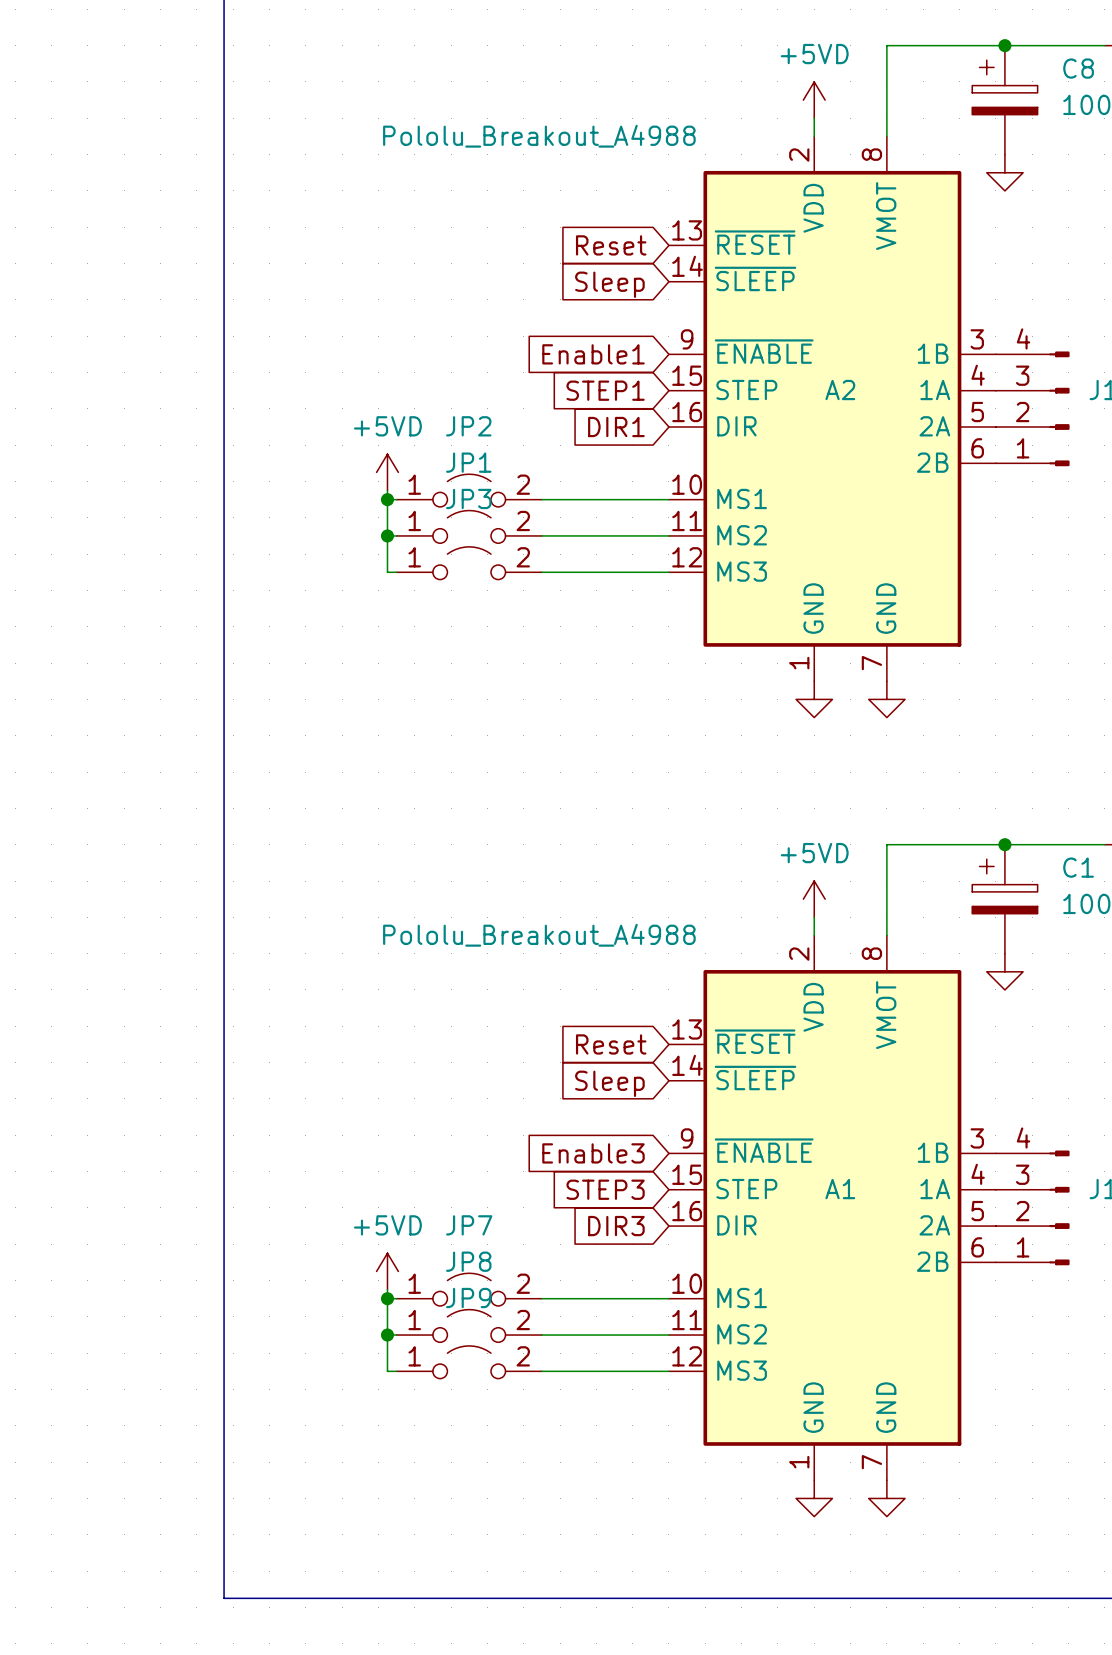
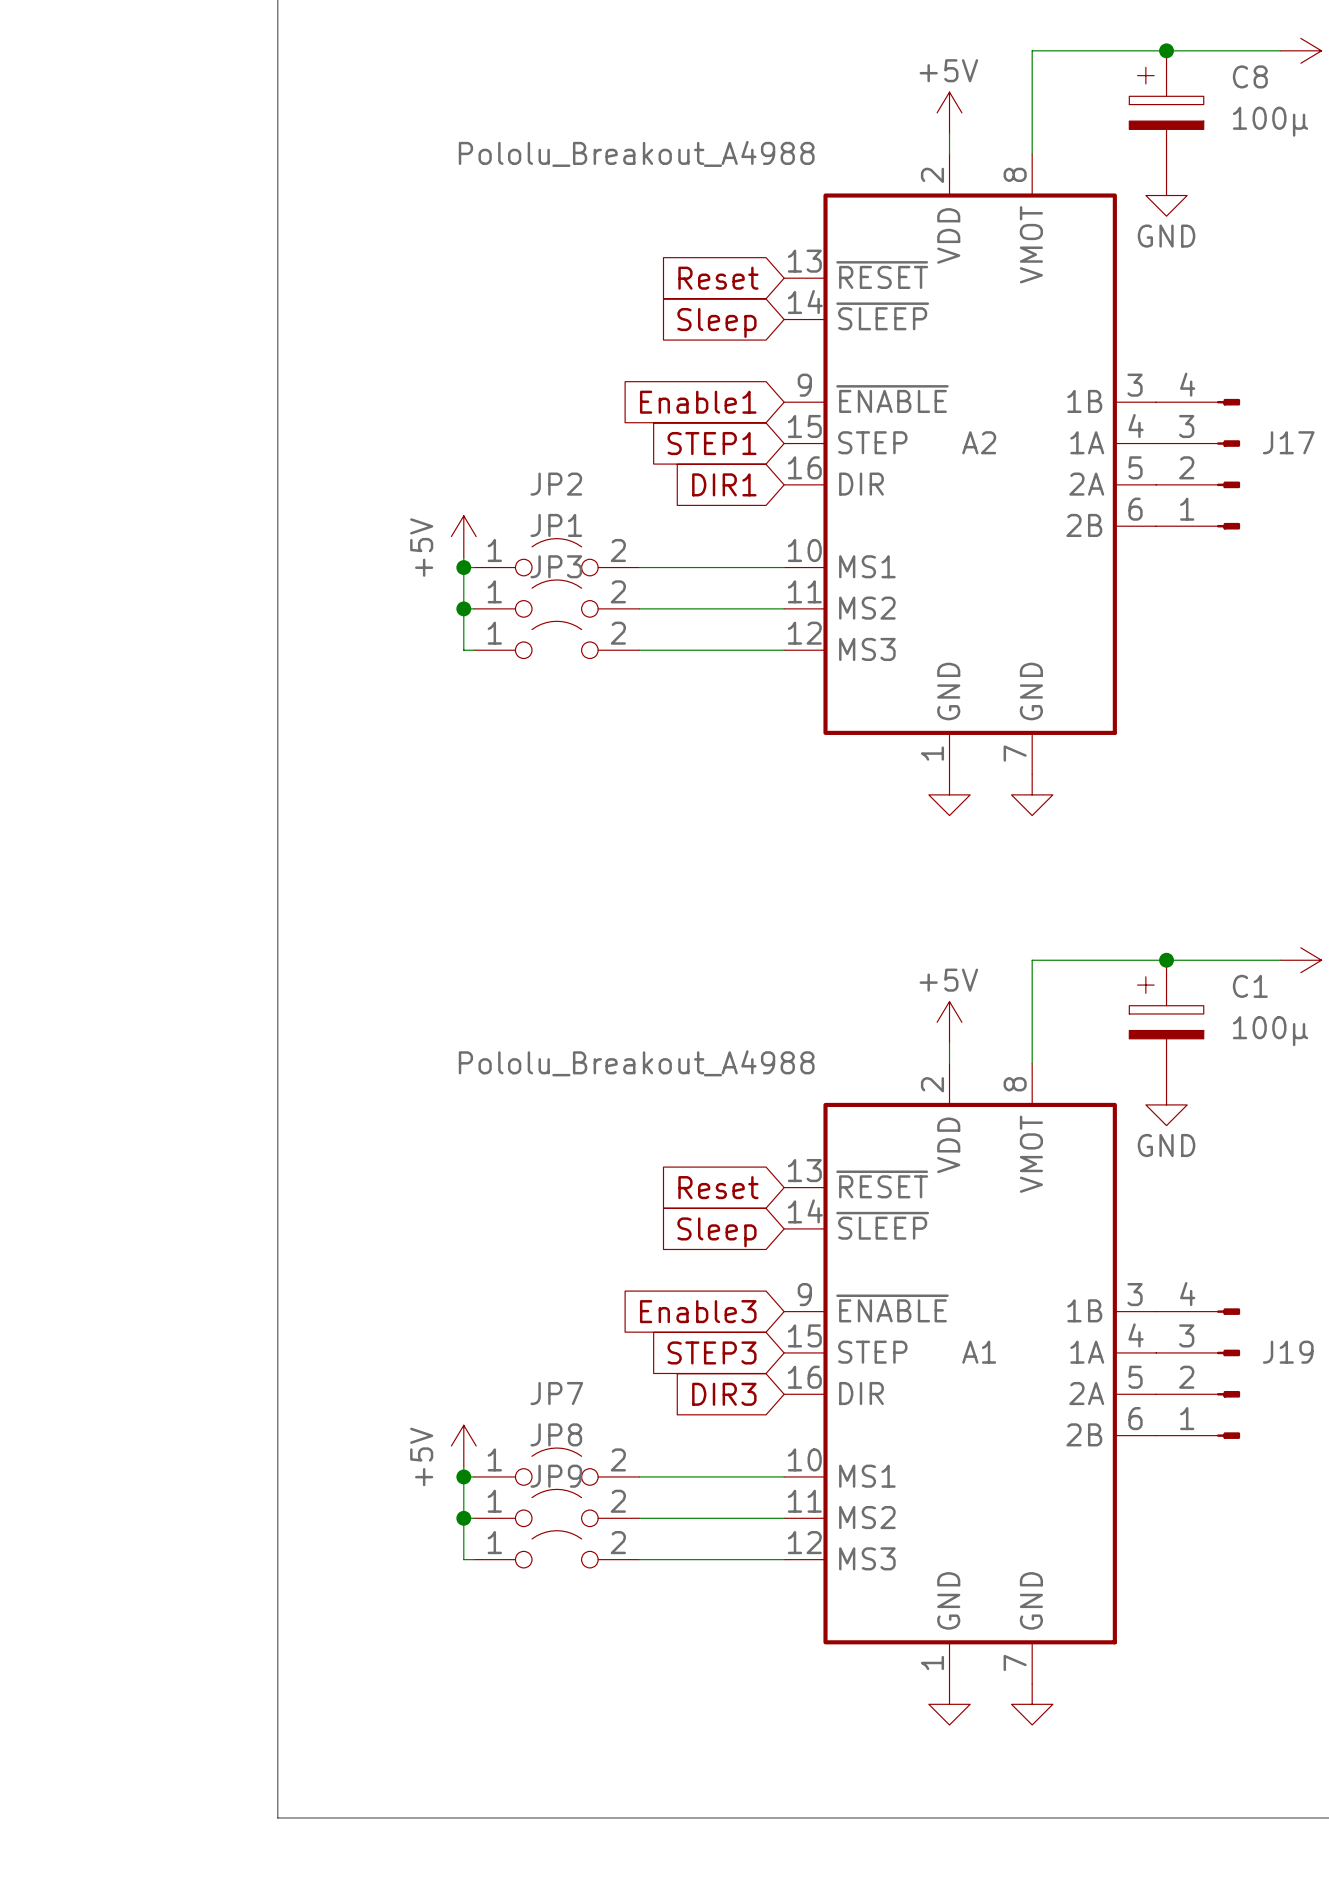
power symbol: +5VD (814, 100) -> +5V (949, 112)
power symbol text: none -> GND (1166, 236)
power symbol: +5VD (387, 472) -> +5V (463, 536)
power symbol: +5VD (814, 899) -> +5V (949, 1022)
power symbol text: none -> GND (1166, 1145)
power symbol: +5VD (387, 1271) -> +5V (463, 1445)

